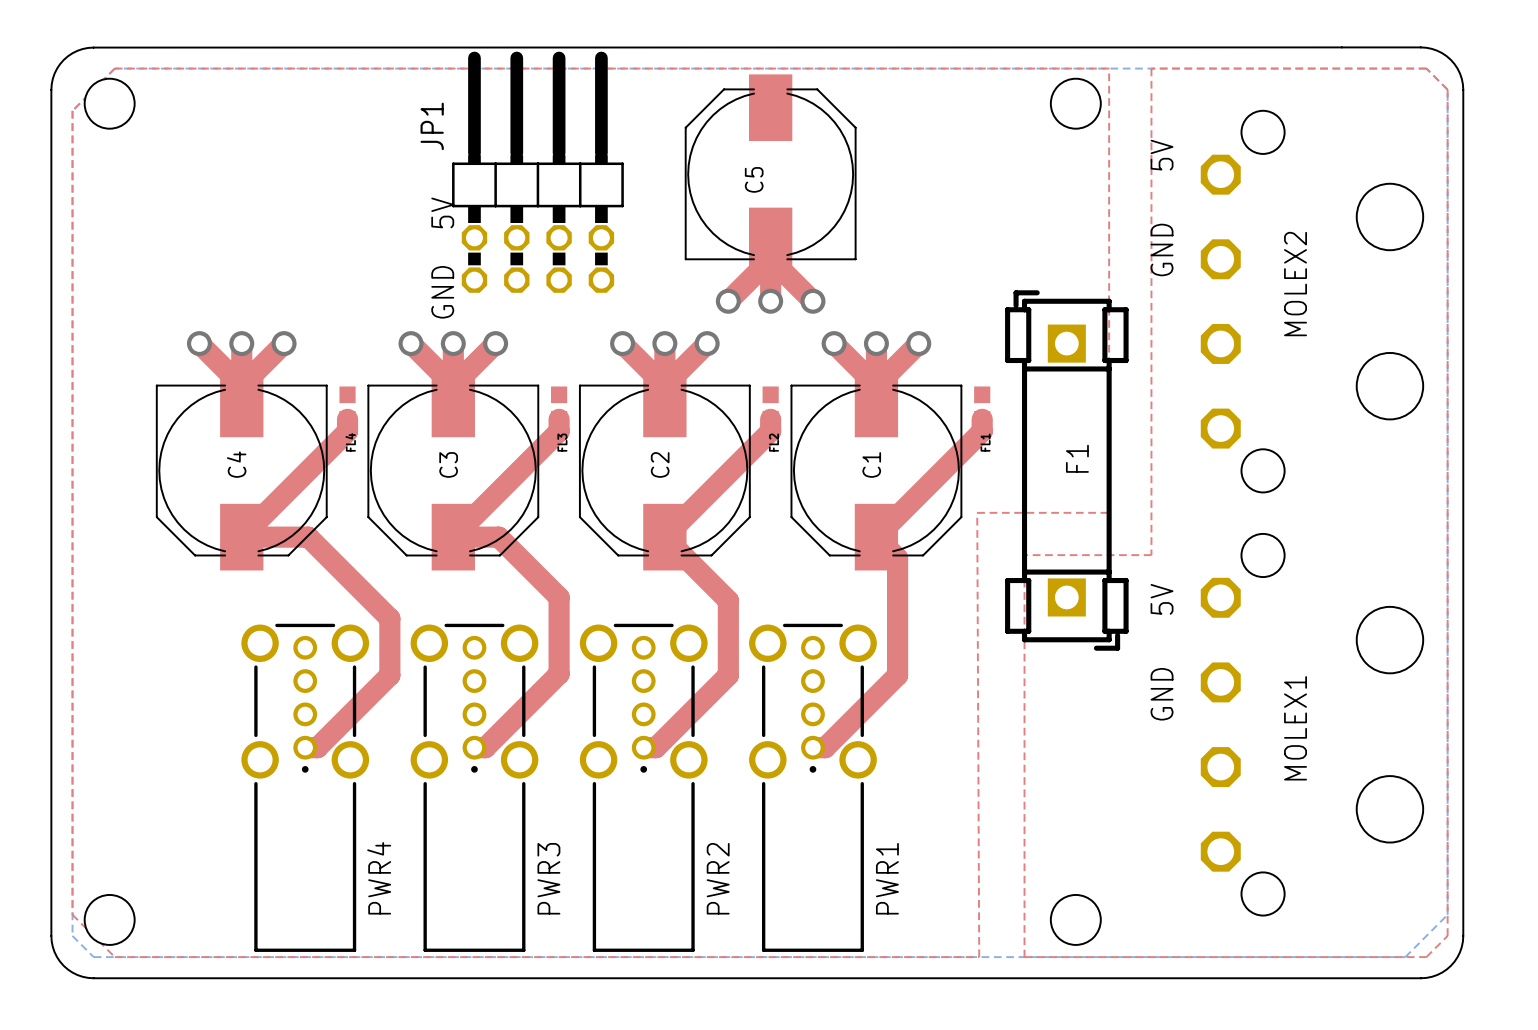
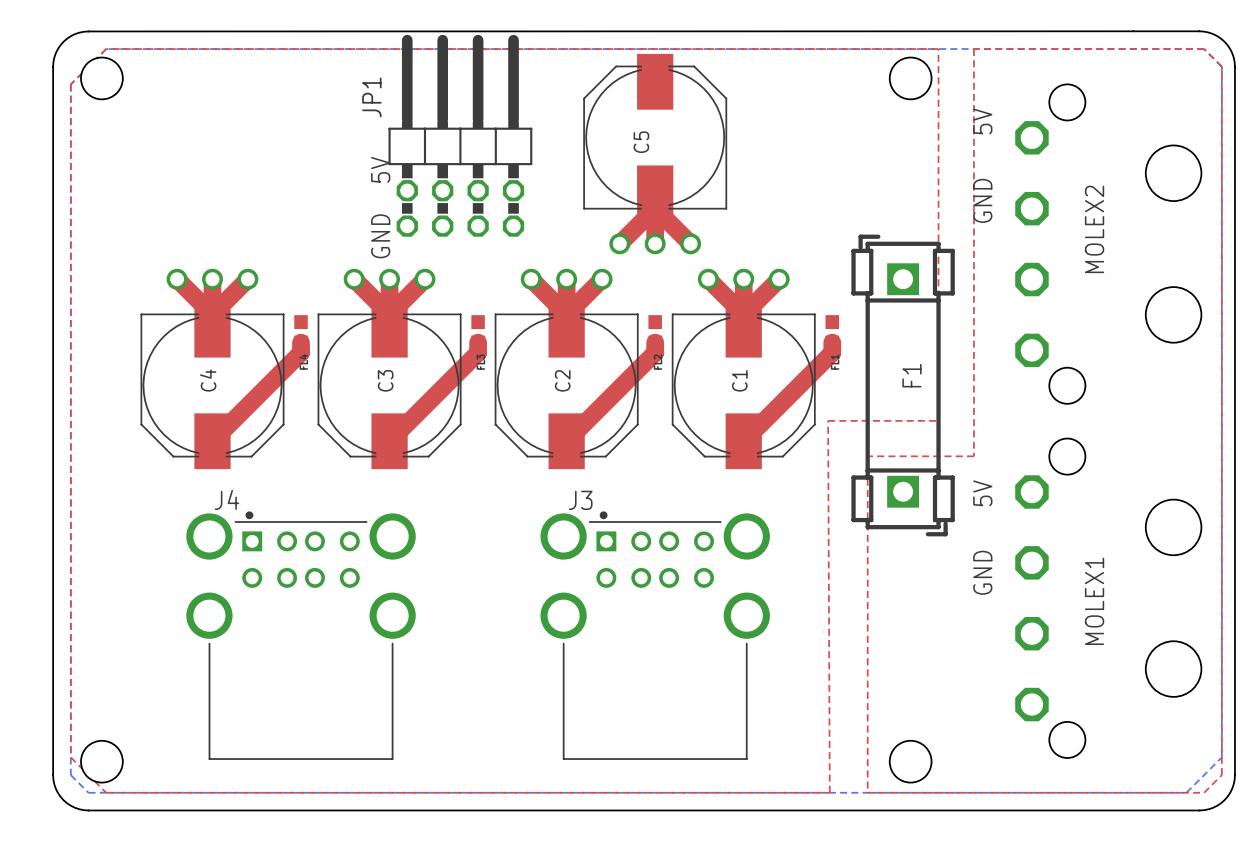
top track: (241, 537) (308, 537) (389, 618) (389, 675) (317, 747) (305, 747) -> none
top track: (453, 537) (498, 537) (559, 597) (559, 673) (485, 747) (474, 747) -> none
top track: (664, 537) (728, 600) (728, 675) (655, 747) (643, 747) -> none
top track: (876, 537) (897, 558) (897, 675) (825, 747) (812, 747) -> none
J4: none -> (301, 635)
J3: none -> (655, 635)
PWR4: (305, 787) -> none
PWR3: (474, 787) -> none
PWR2: (643, 787) -> none
PWR1: (812, 787) -> none

